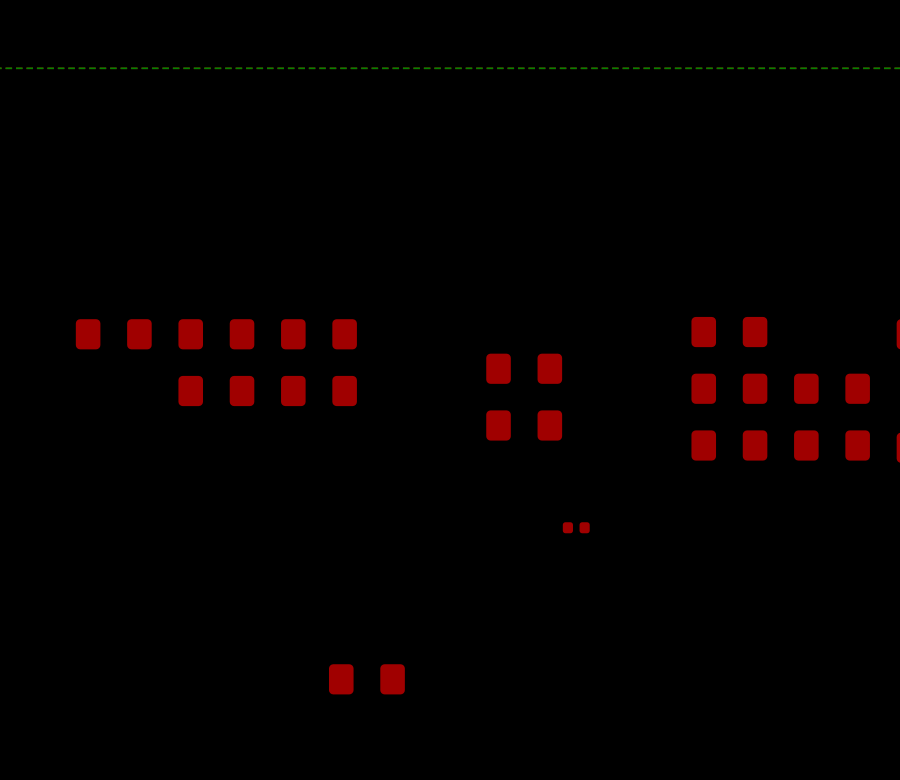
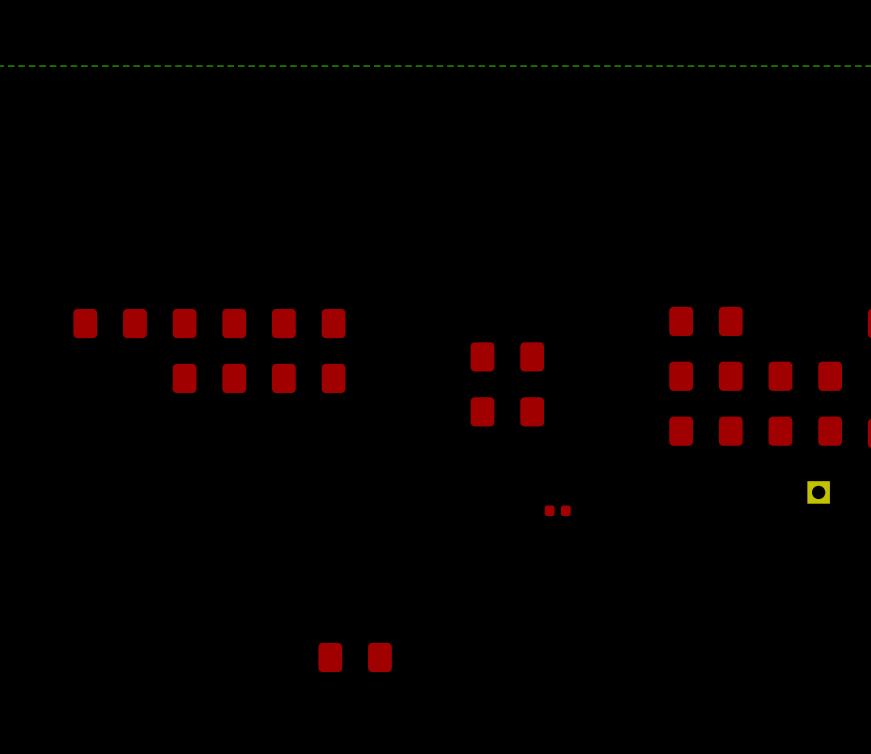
part: none -> (818, 492)

